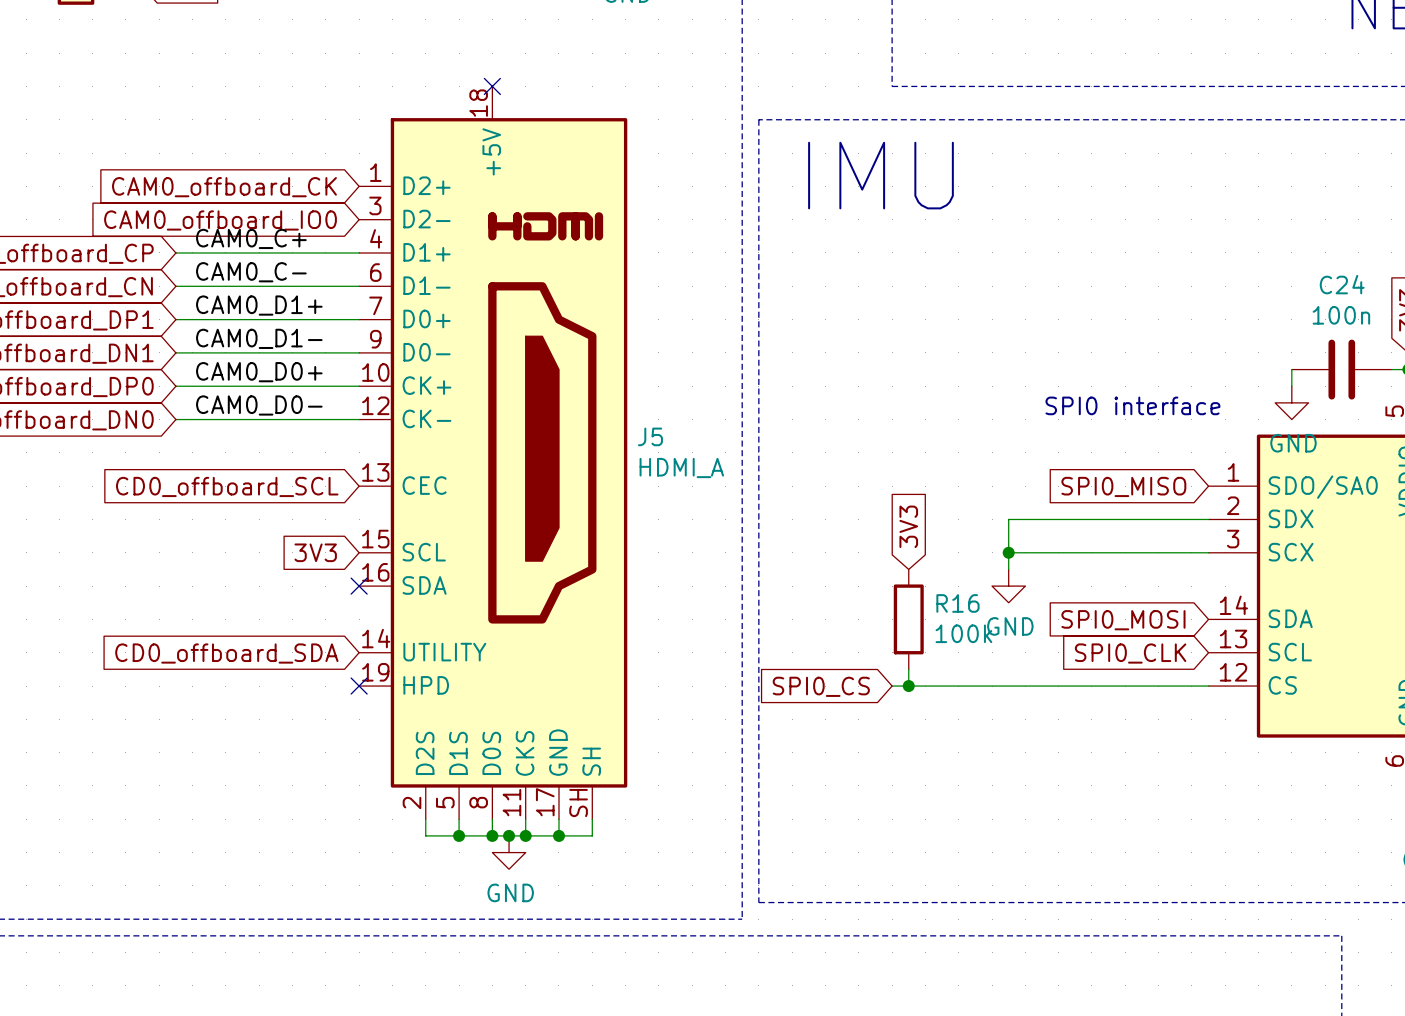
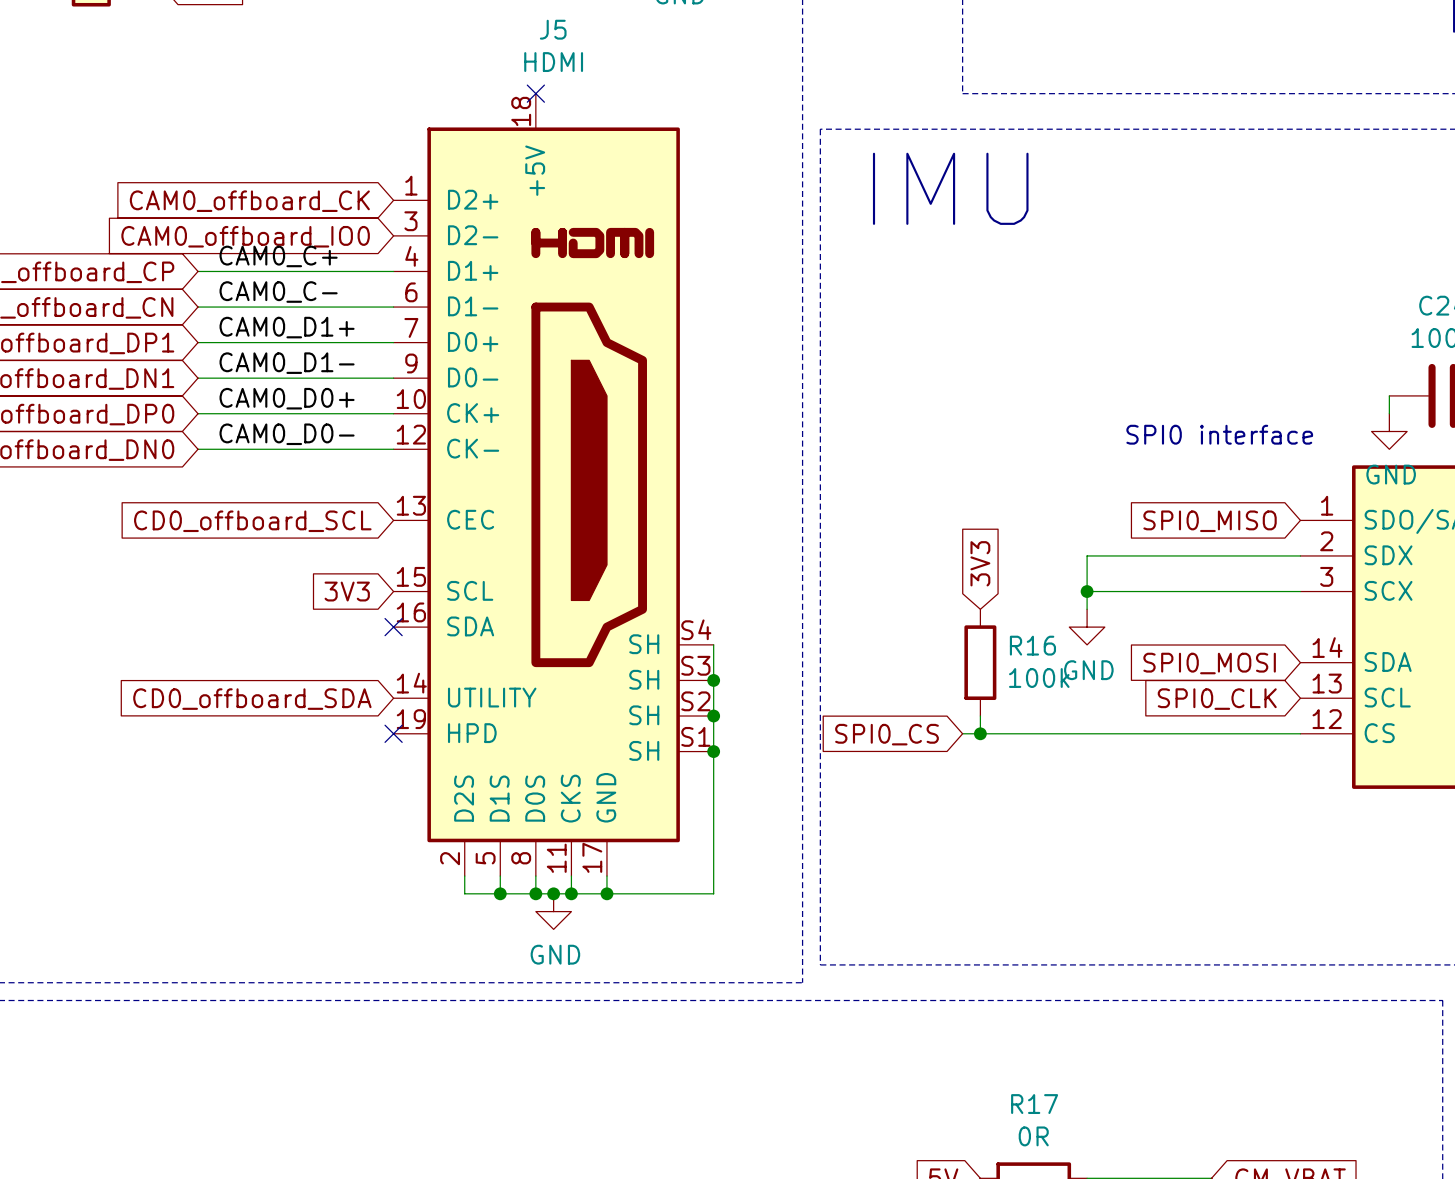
J5 symbol: [359, 86, 628, 820] -> [393, 93, 714, 877]
J5 name position: J5 (650, 436) -> J5 (553, 29)
J5 value: HDMI_A (681, 468) -> HDMI (553, 62)
junction: none -> (713, 680)
junction: none -> (713, 716)
junction: none -> (713, 751)
wire: (592, 819) (592, 835) -> (713, 644) (713, 893) (642, 893)

